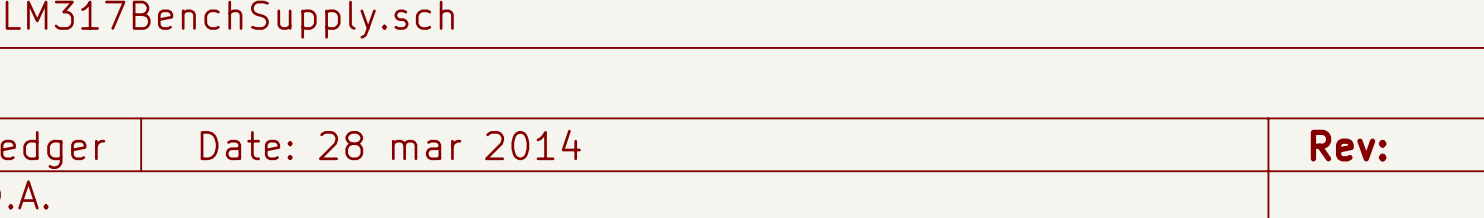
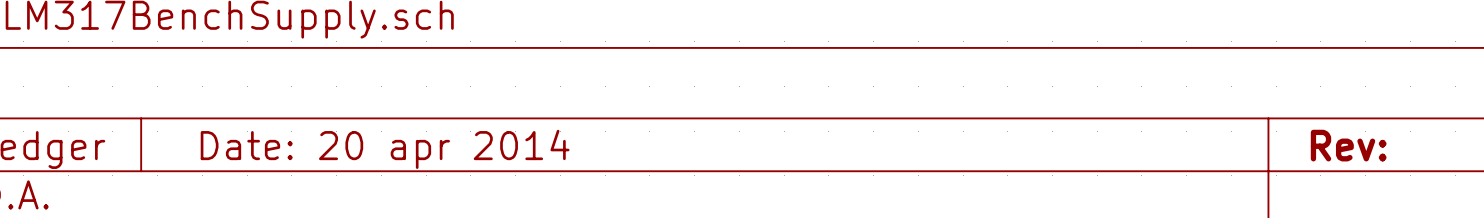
title block: Date: 28 mar 2014 (390, 144) -> Date: 20 apr 2014 (385, 149)

